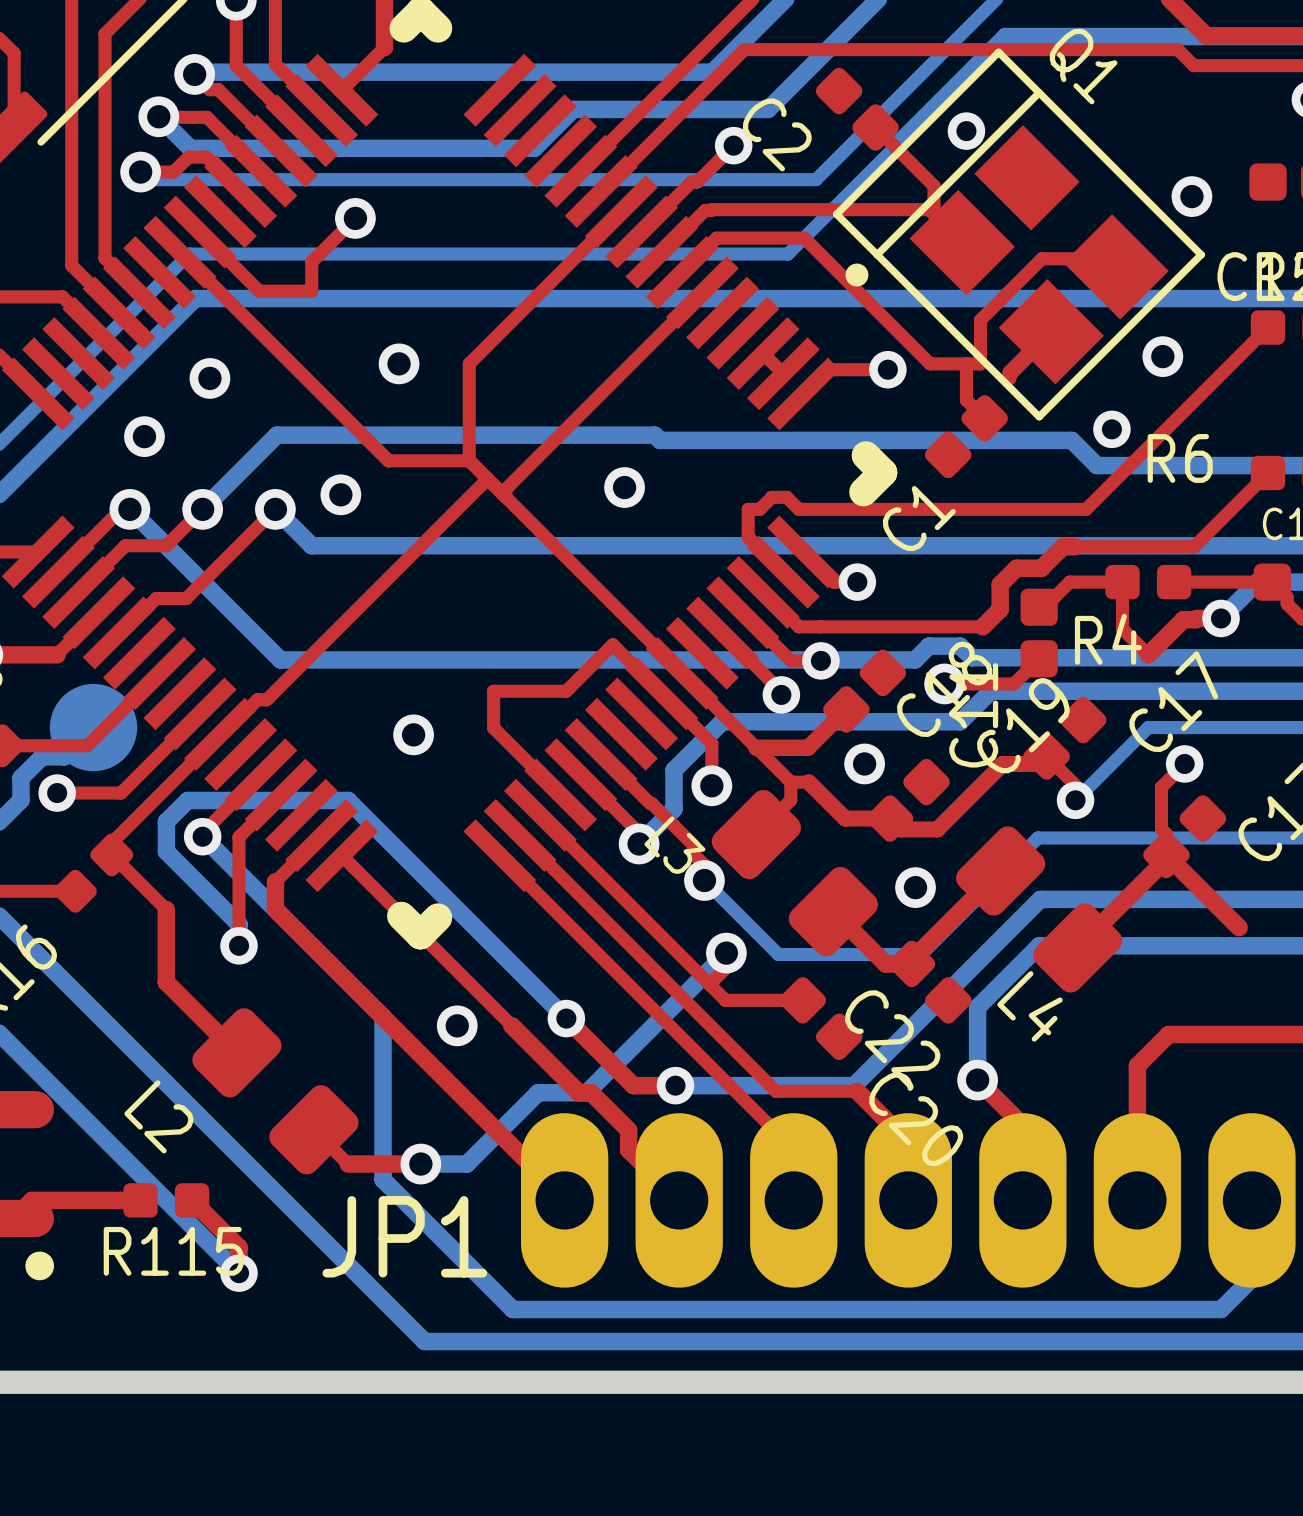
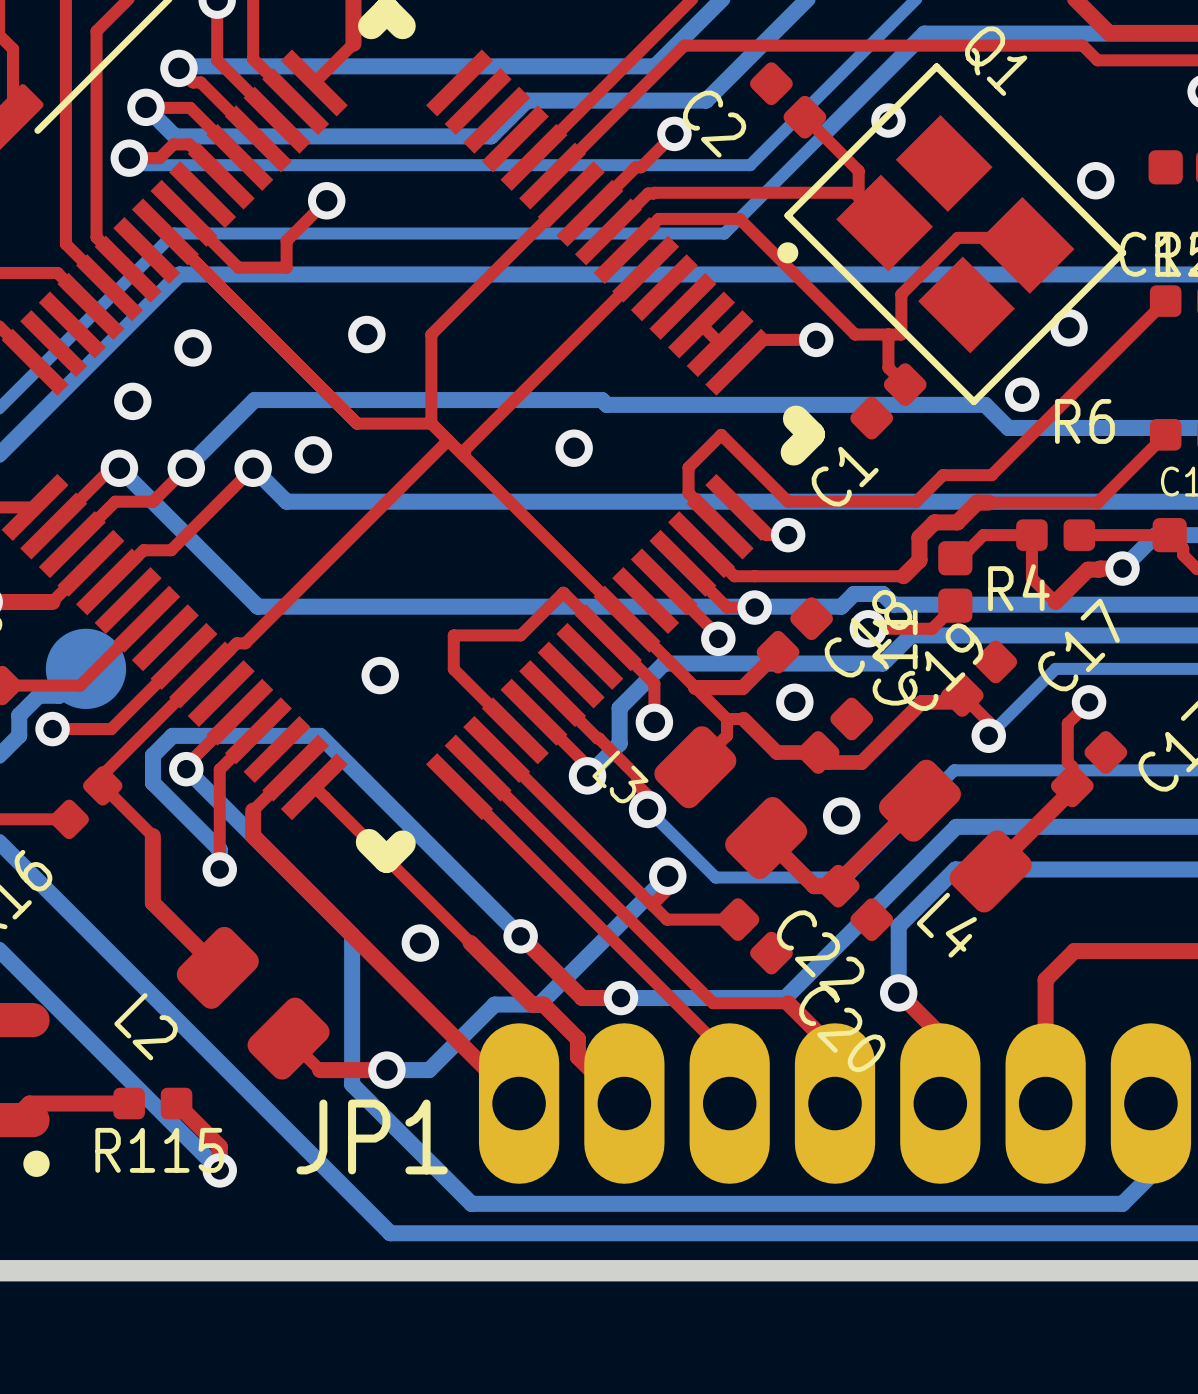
Q1 footprint: [833, 48, 1205, 421] -> [777, 63, 1127, 406]
top track: (1051, 331) (1010, 372) (1010, 378) -> none
top track: (1086, 509) (798, 509) (786, 497) (771, 497) (759, 509) (748, 509) (748, 537) (783, 572) -> (998, 468) (991, 475) (942, 475) (916, 501) (788, 501) (721, 434) (688, 467) (688, 493) (720, 526)
top track: (1166, 854) (1239, 927) -> none

